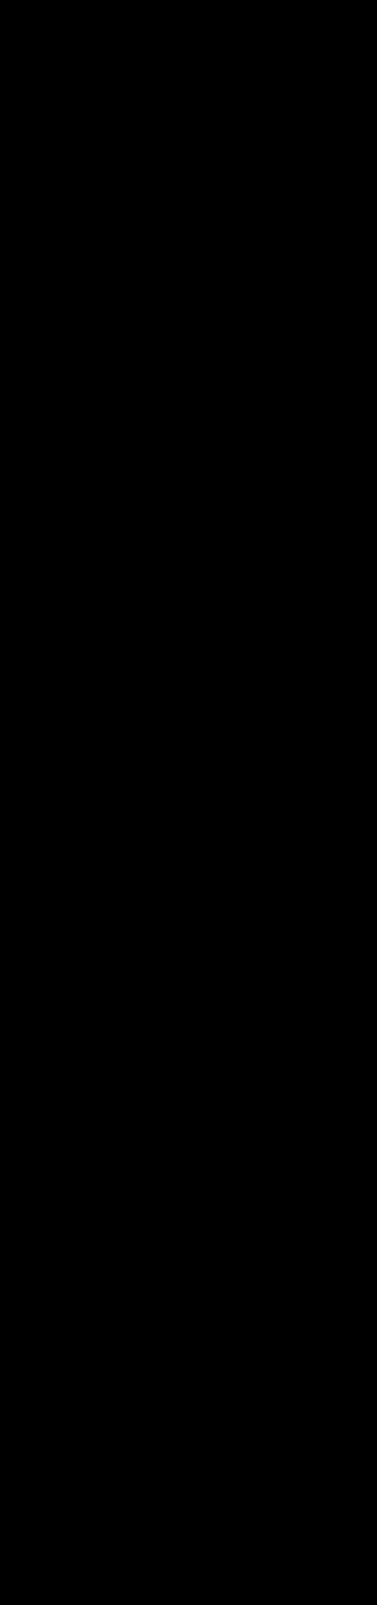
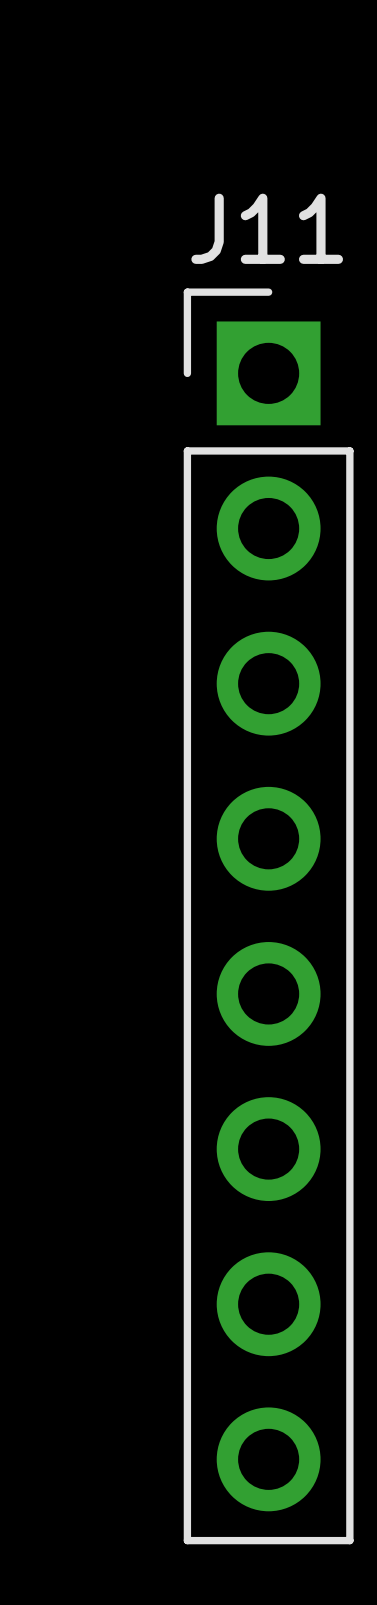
J11: none -> (268, 916)

